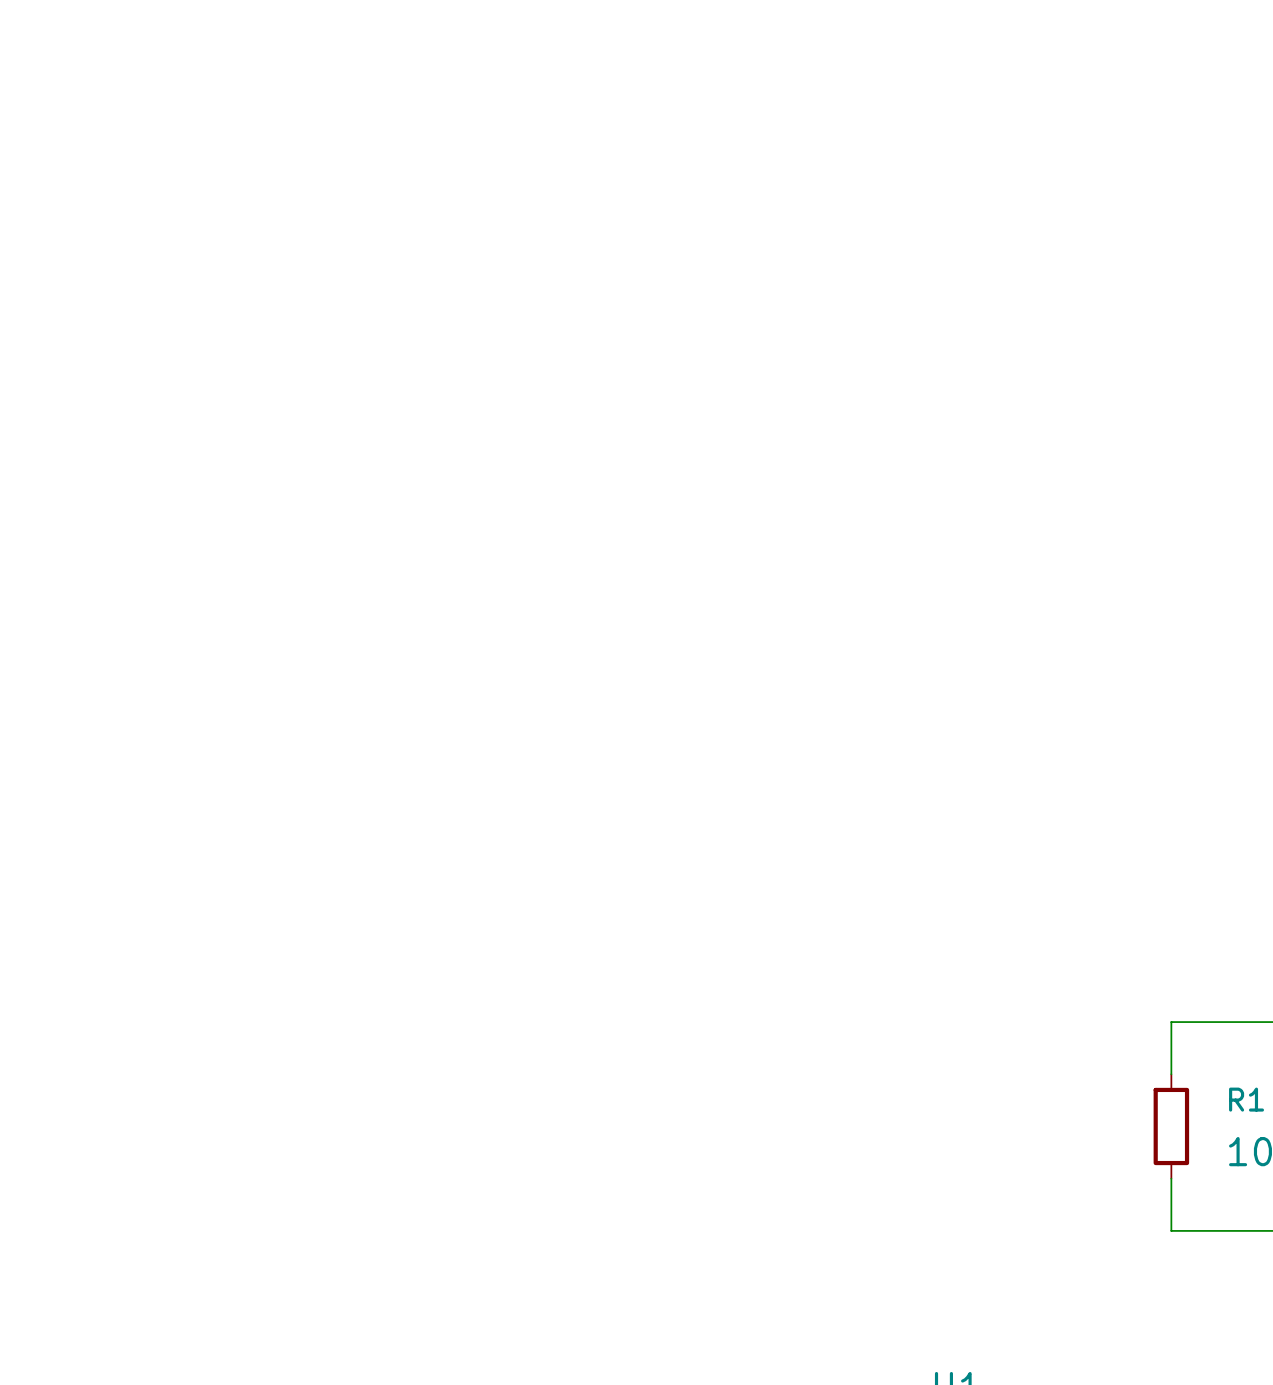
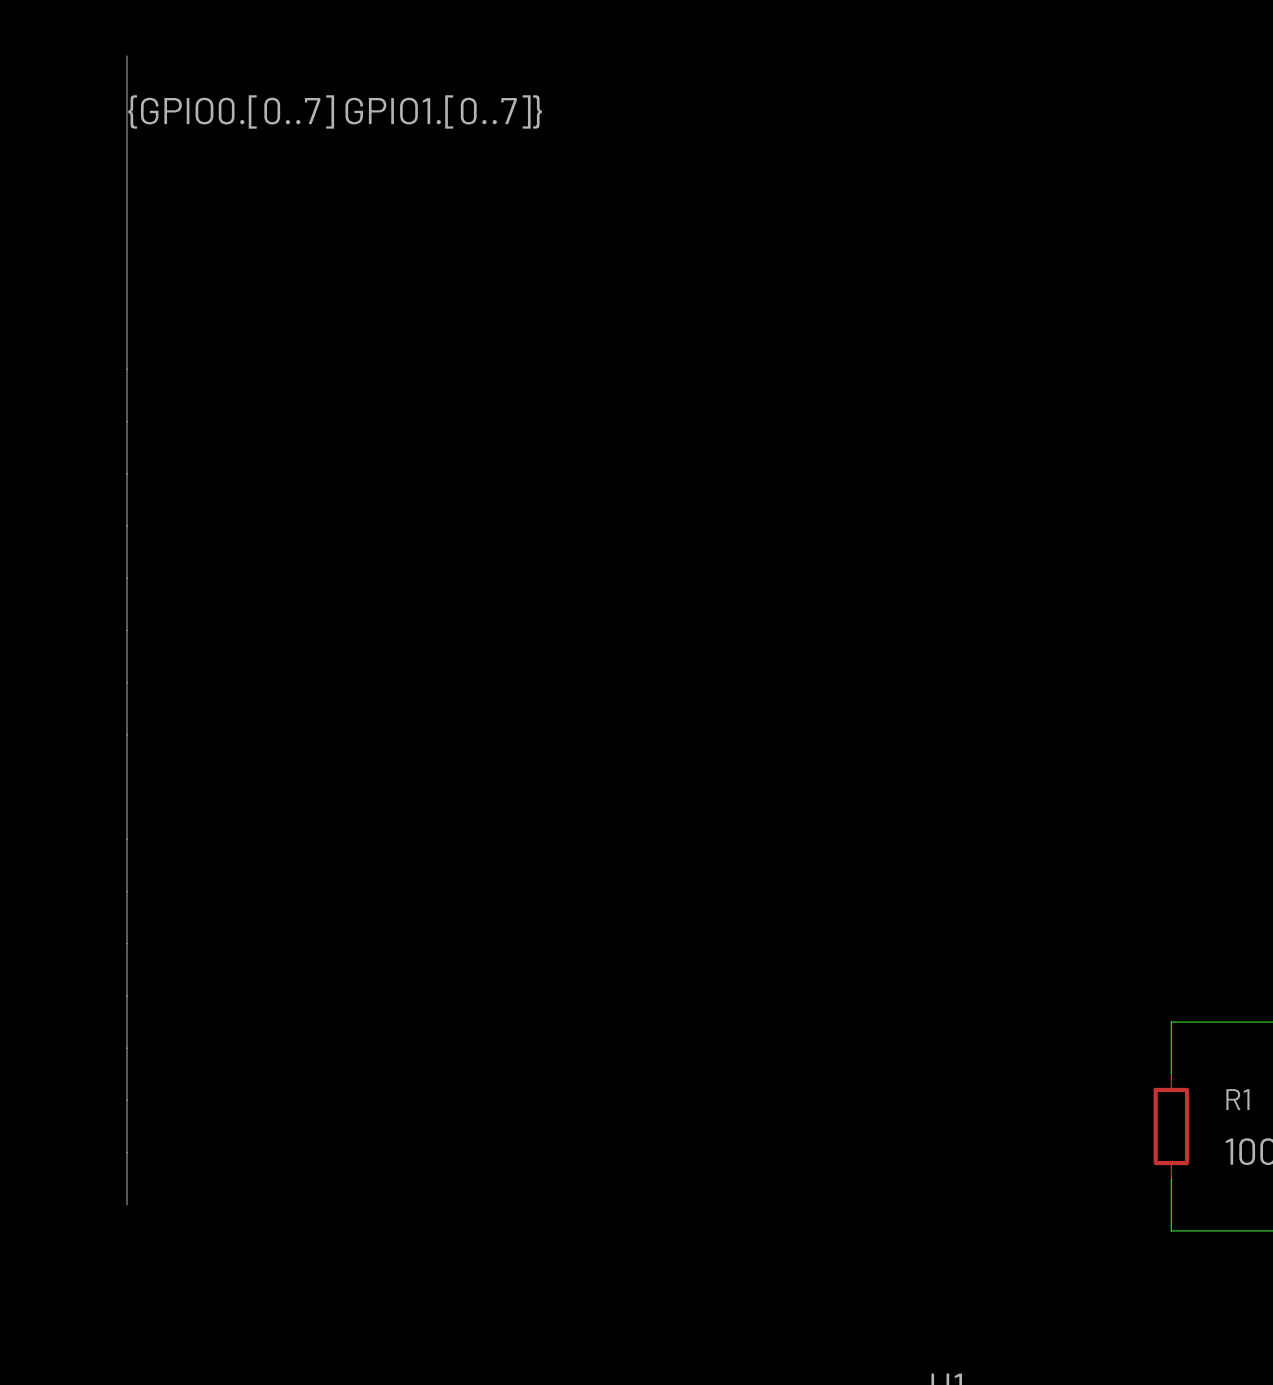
bus: none -> (127, 56) (127, 1204)
label: none -> {GPIO0.[0..7] GPIO1.[0..7]} (335, 111)

